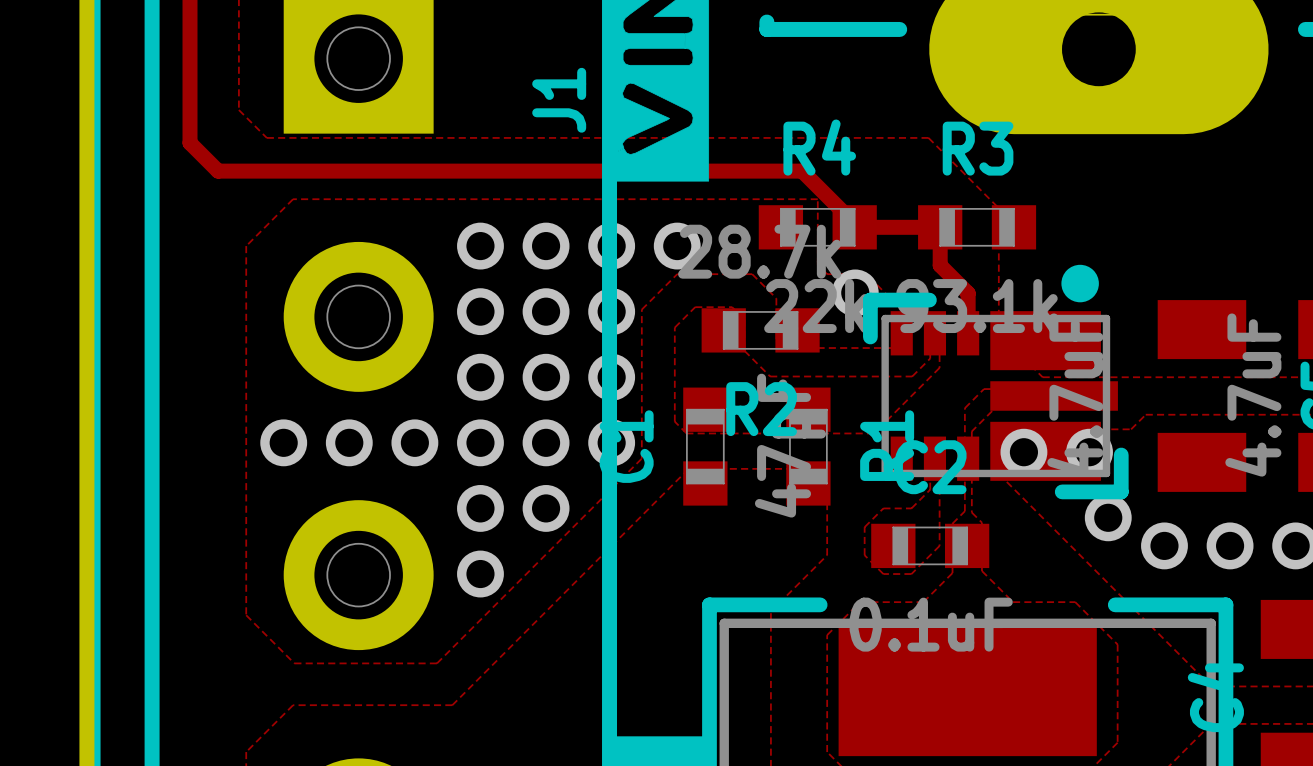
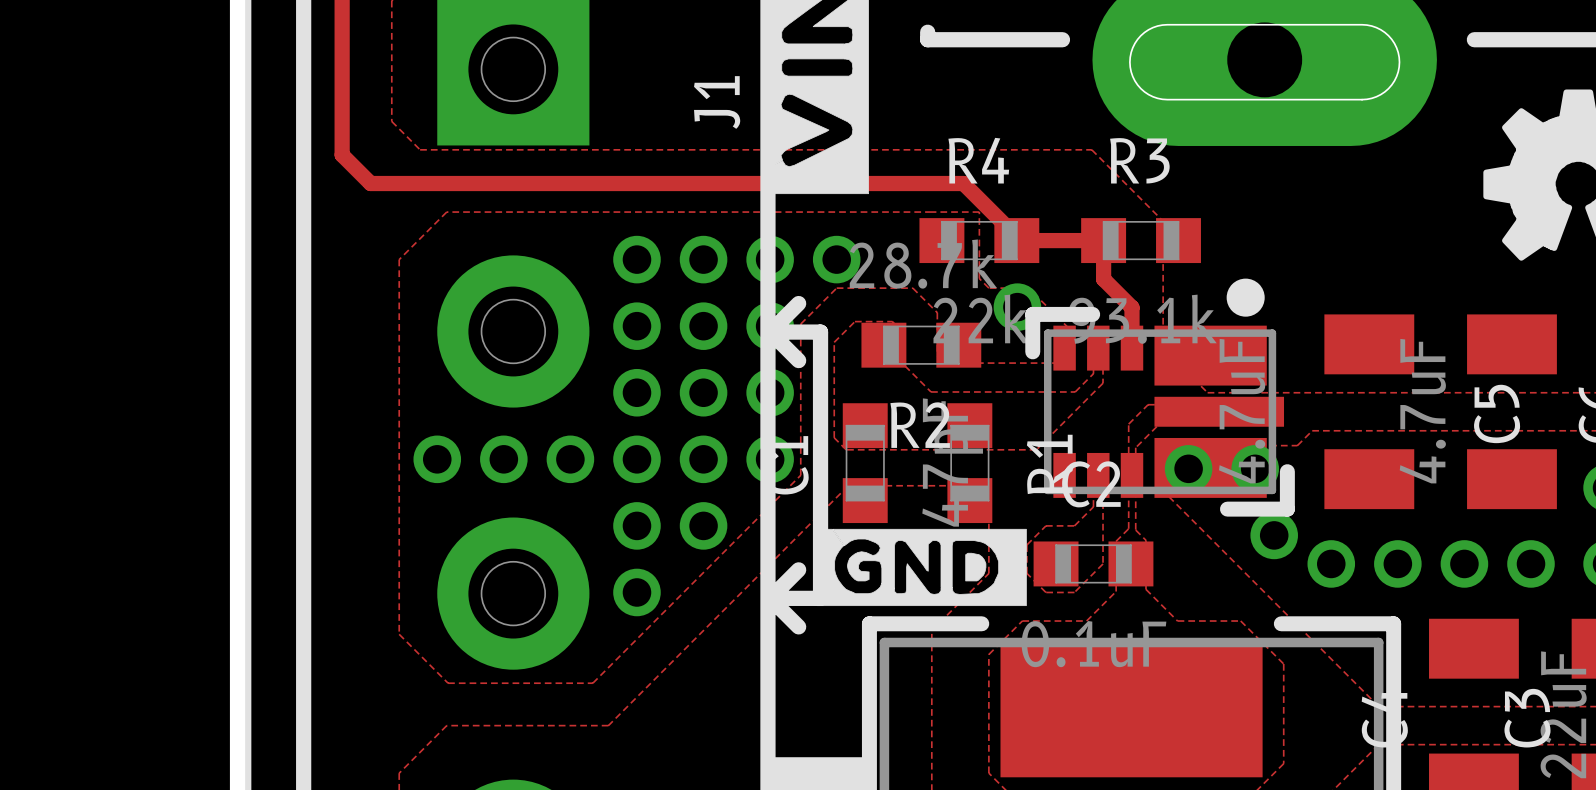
line: none -> (798, 303) (770, 332)
line: none -> (770, 332) (820, 332) (820, 598) (770, 598)
line: none -> (770, 332) (798, 360)
drawing: none -> [813, 528, 1027, 607]
line: none -> (798, 569) (770, 598)
line: none -> (770, 598) (798, 626)

